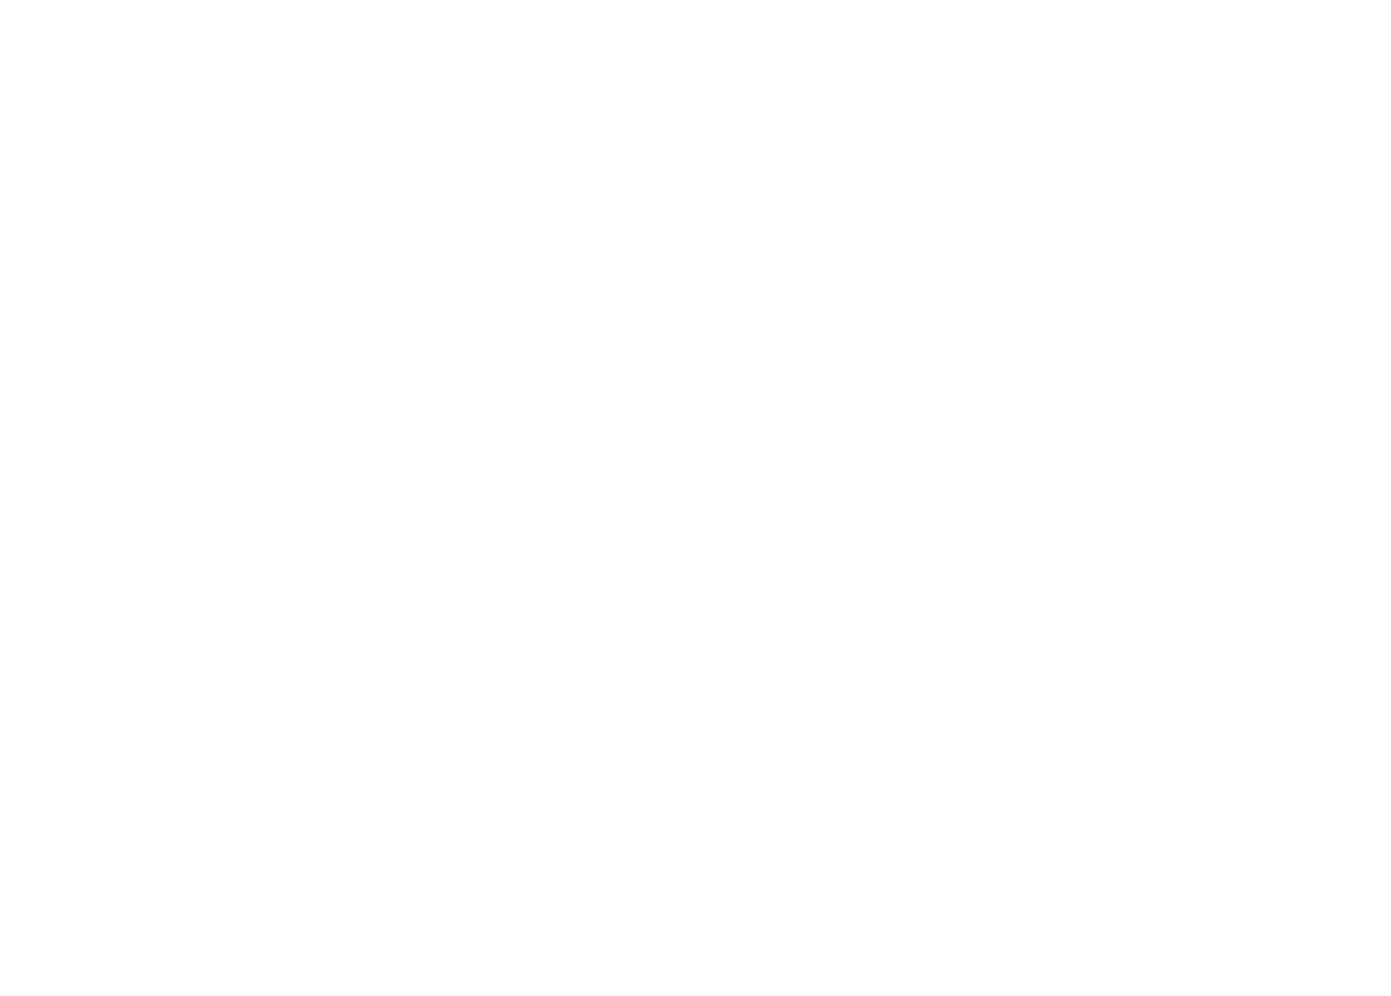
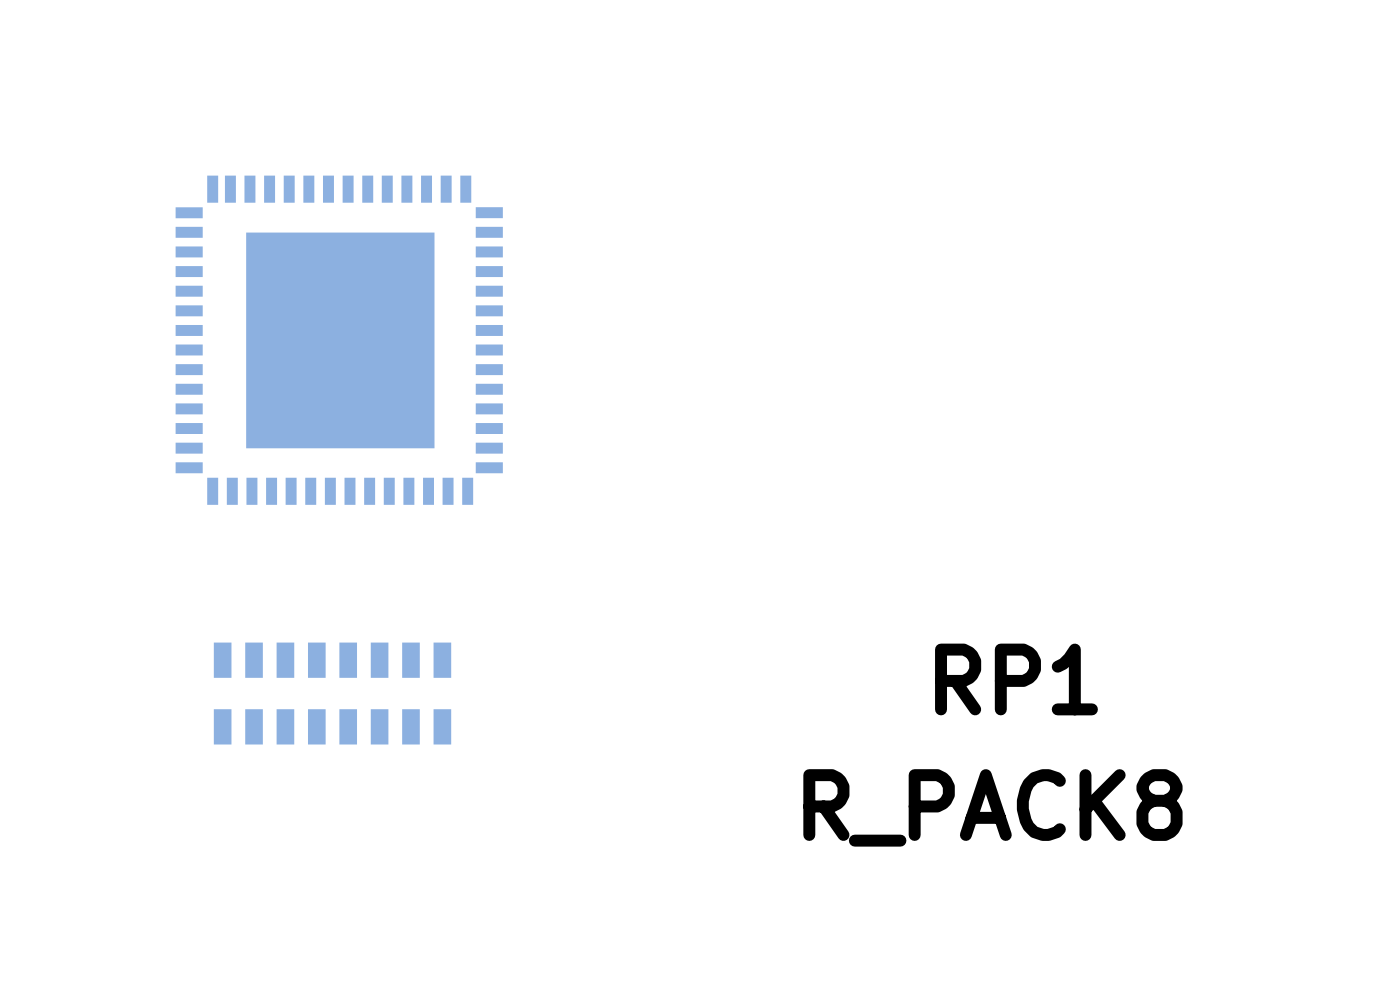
part: none -> (339, 340)
RP1: none -> R_PACK8 (332, 693)

